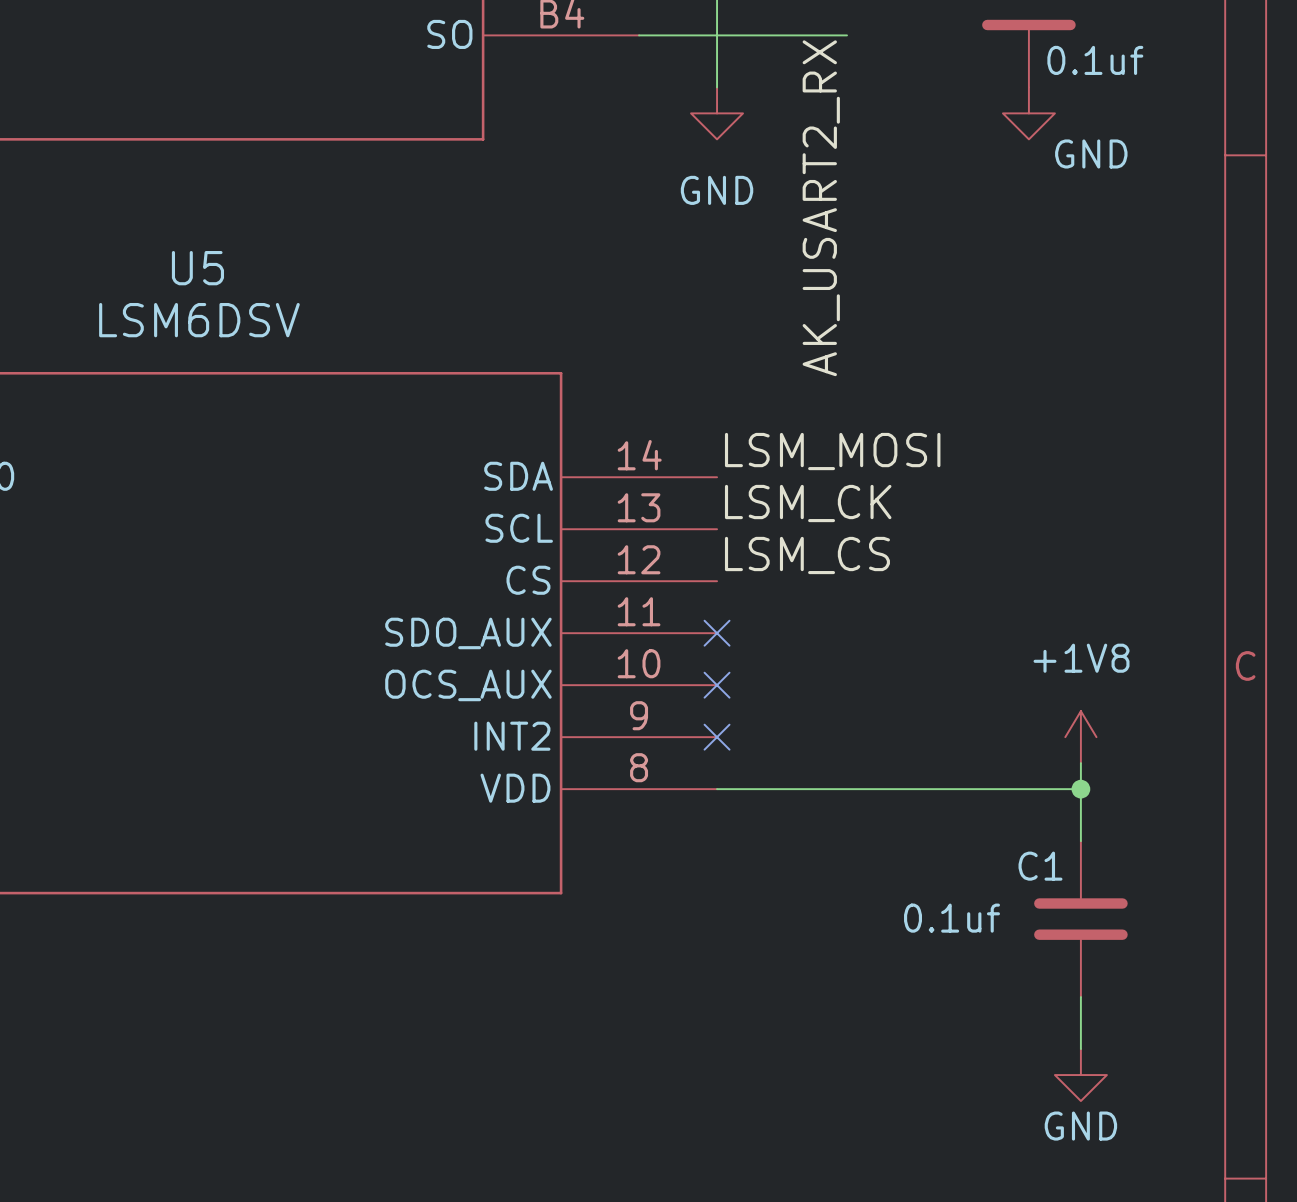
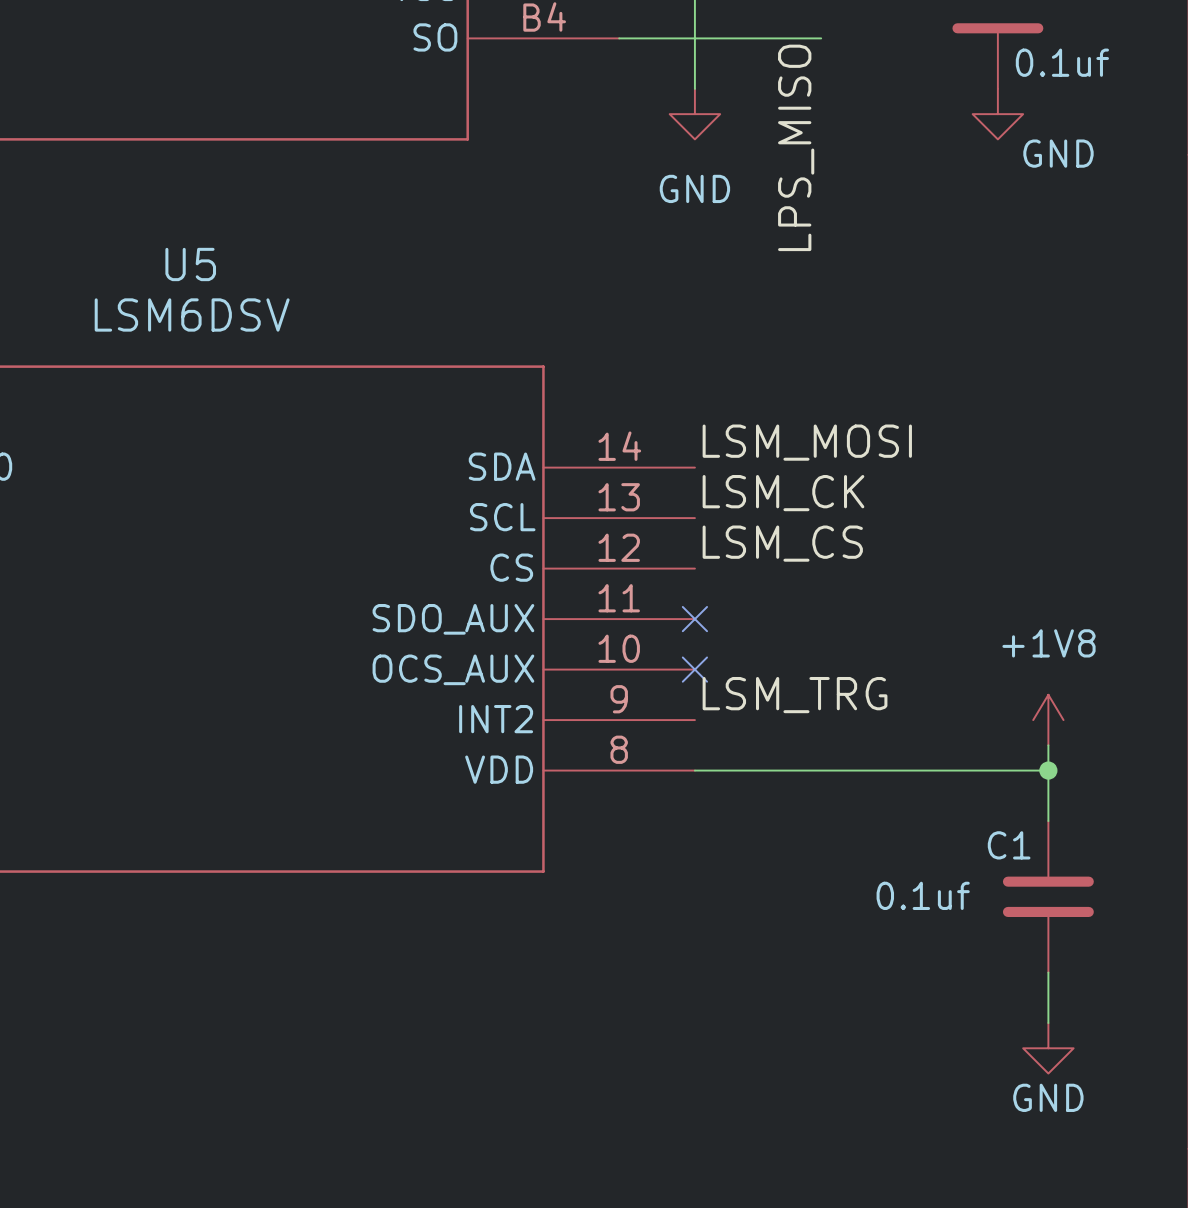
label: AK_USART2_RX (821, 208) -> LPS_MISO (796, 147)
label: none -> LSM_TRG (795, 695)
no-connect mark: (717, 737) -> none

